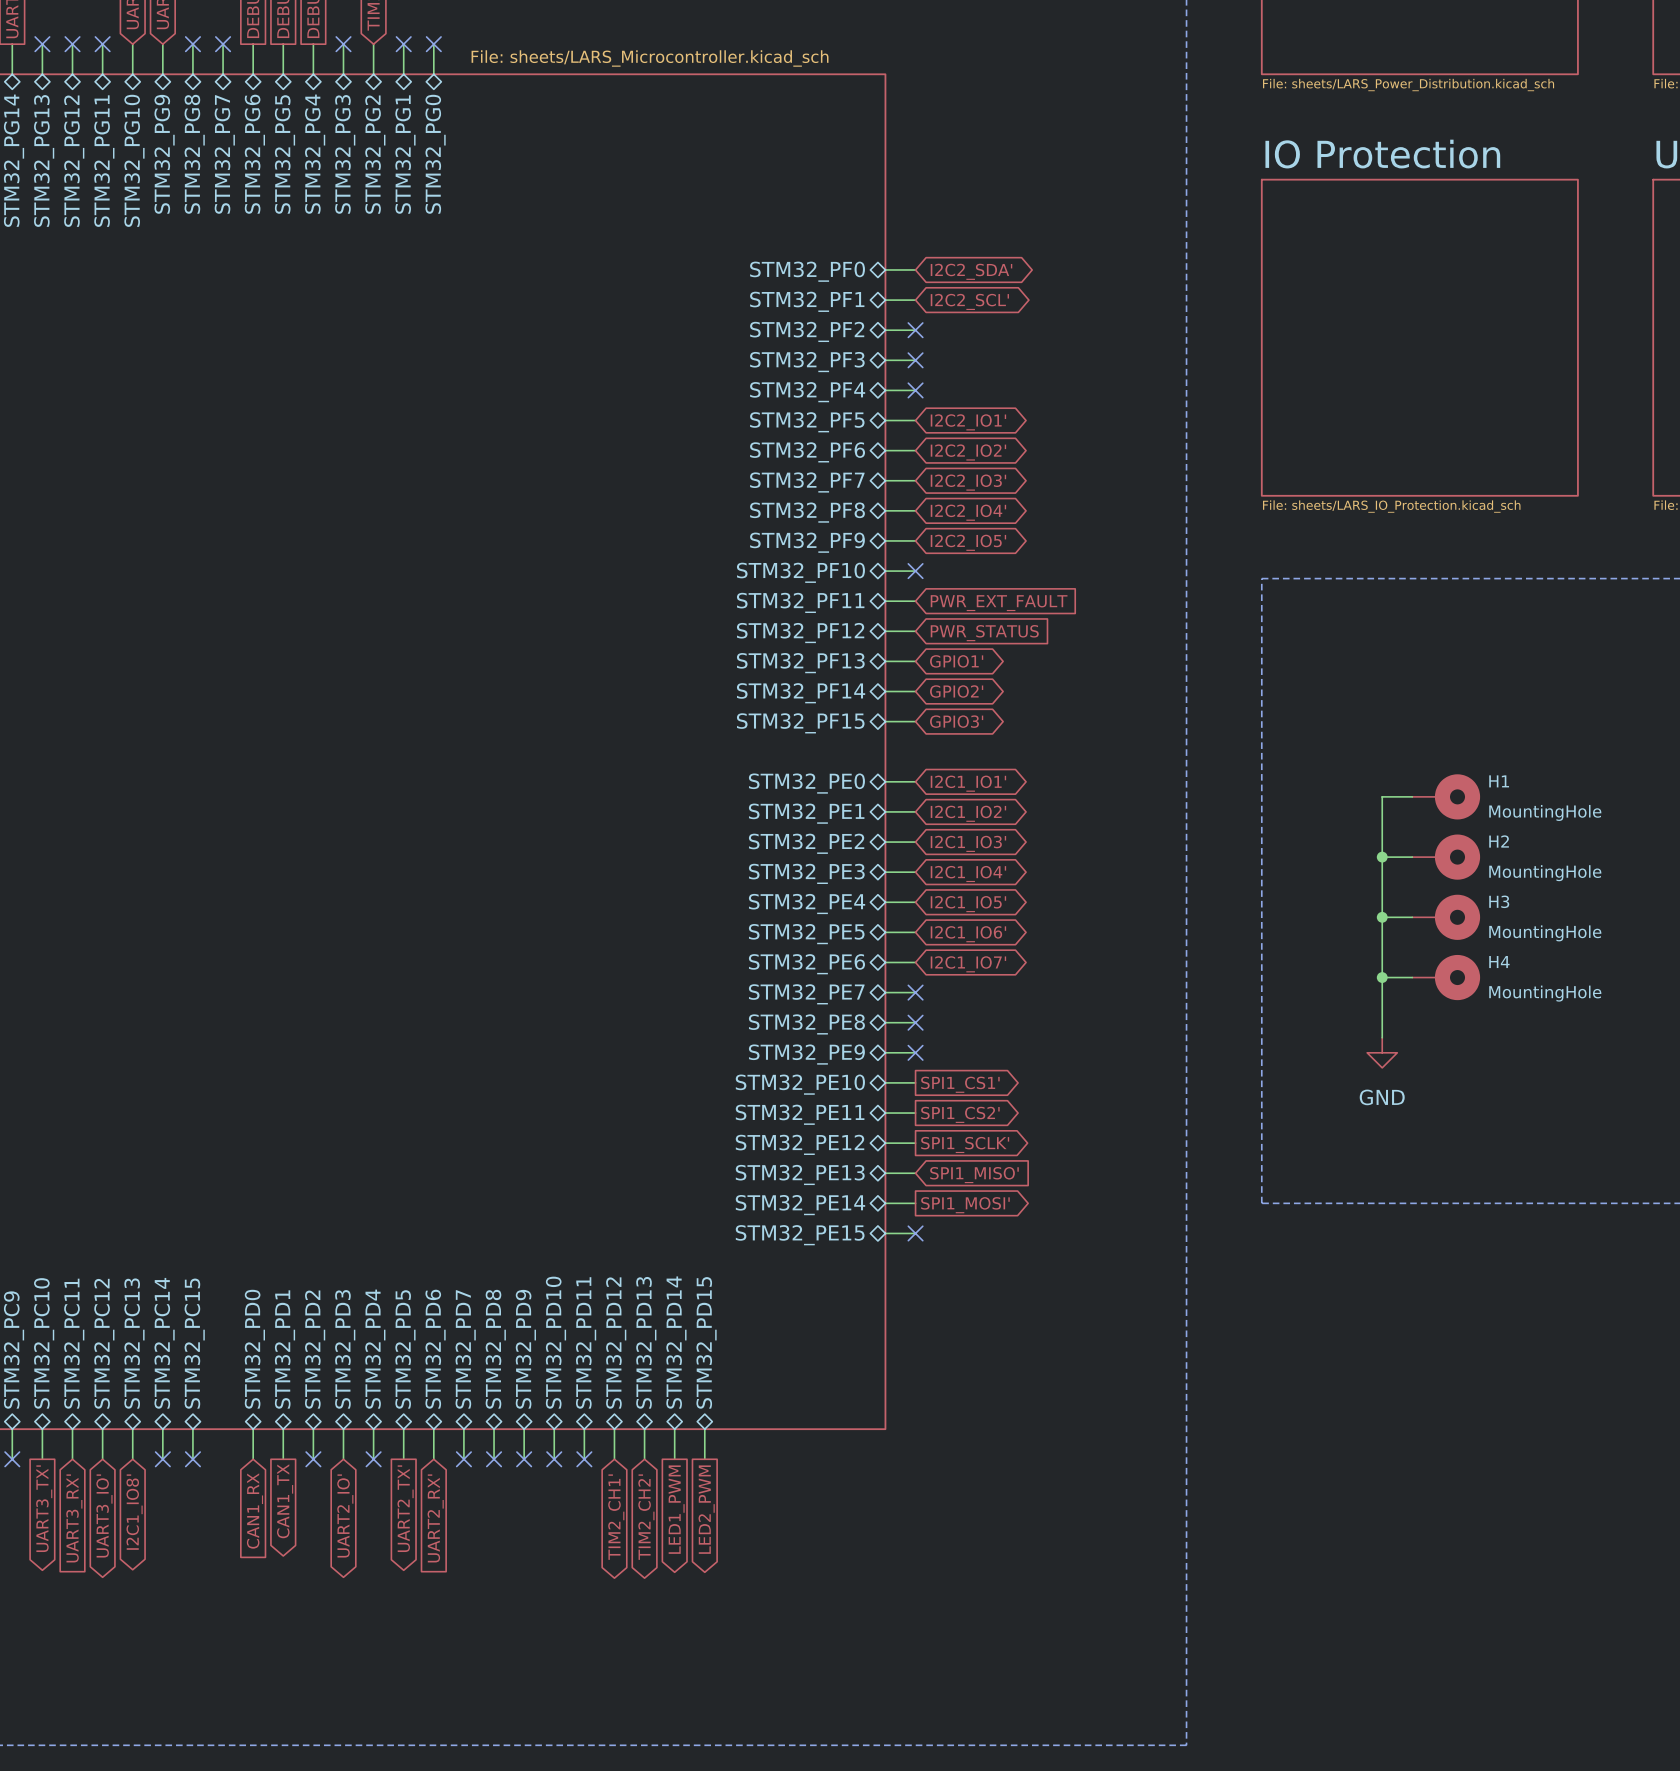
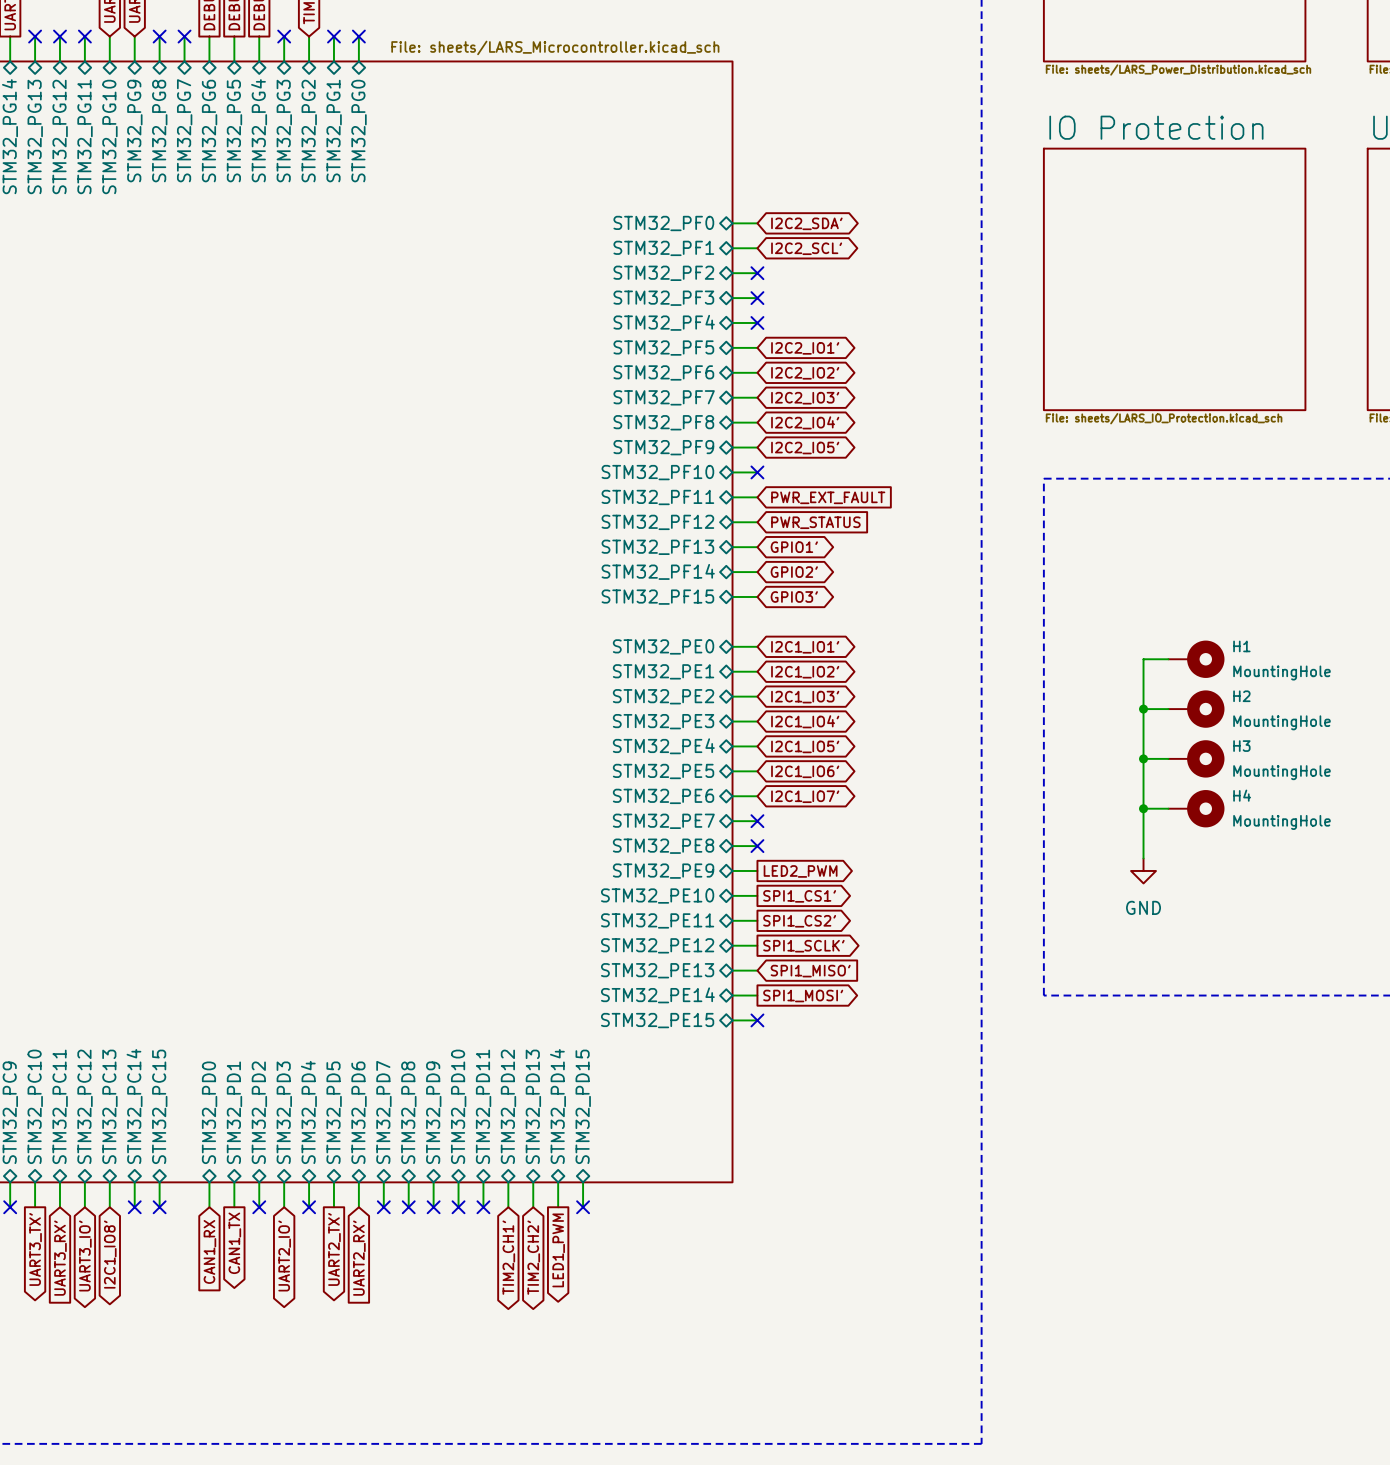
no-connect mark: (915, 1052) -> none
global label: none -> LED2_PWM (800, 871)
no-connect mark: none -> (583, 1207)
global label: LED2_PWM (706, 1509) -> none

